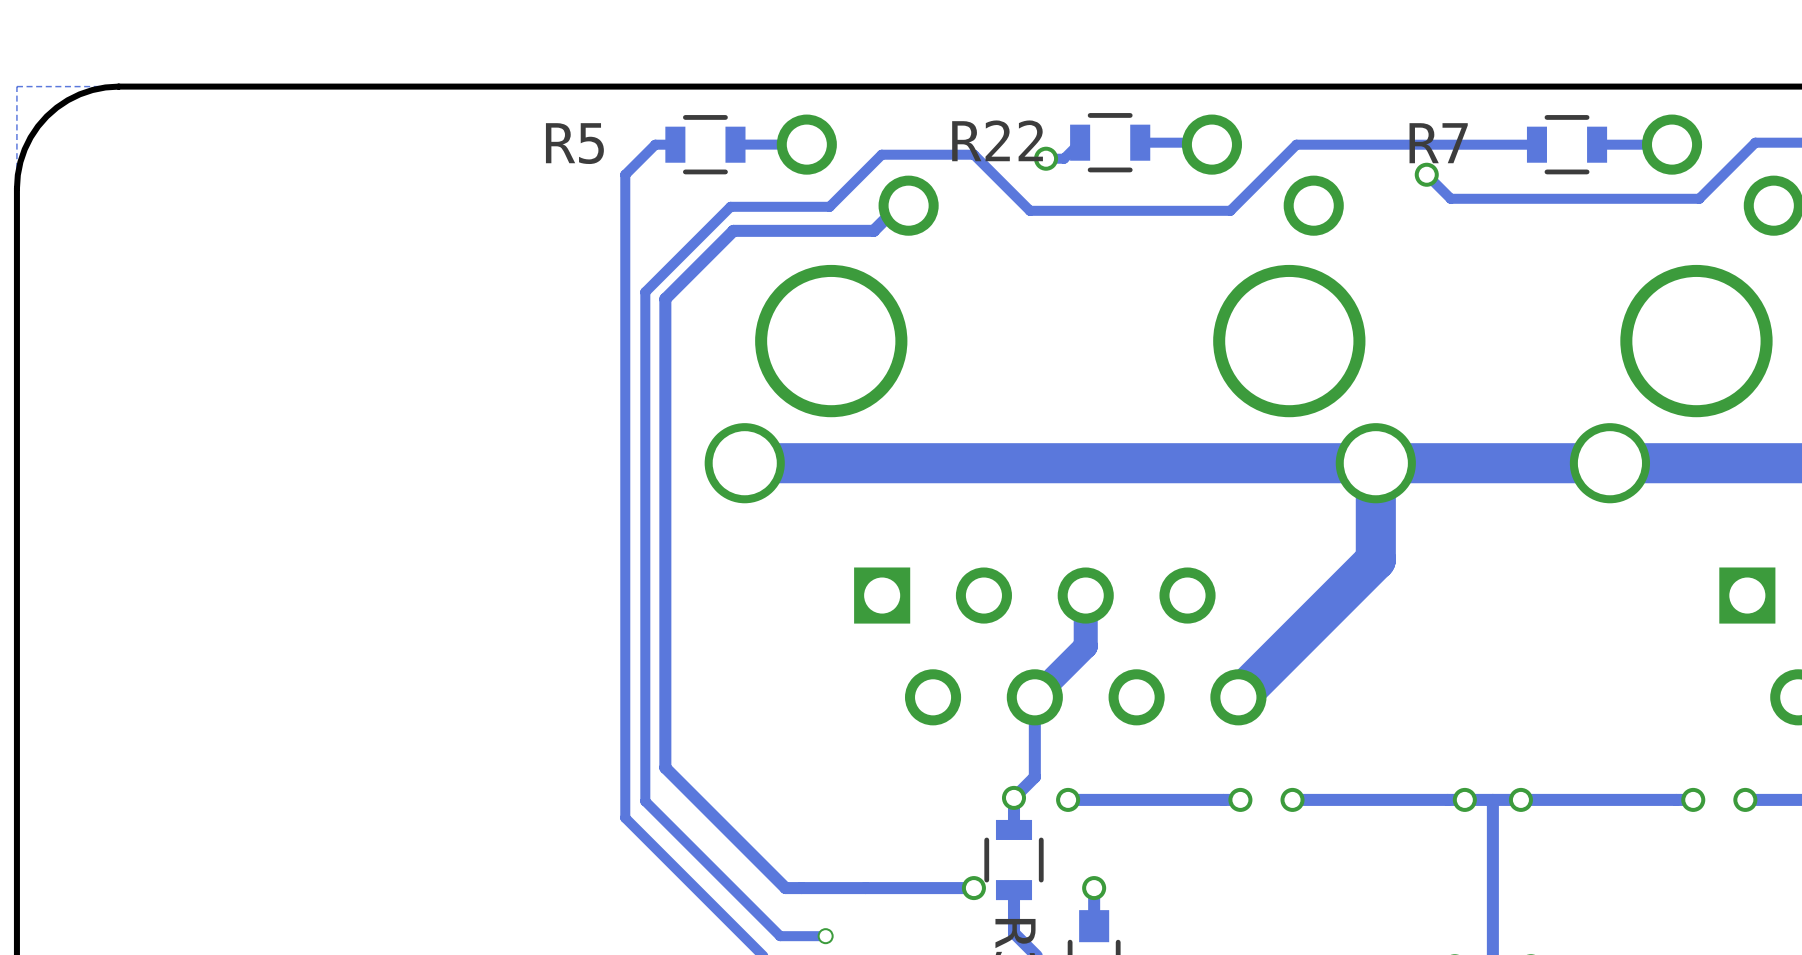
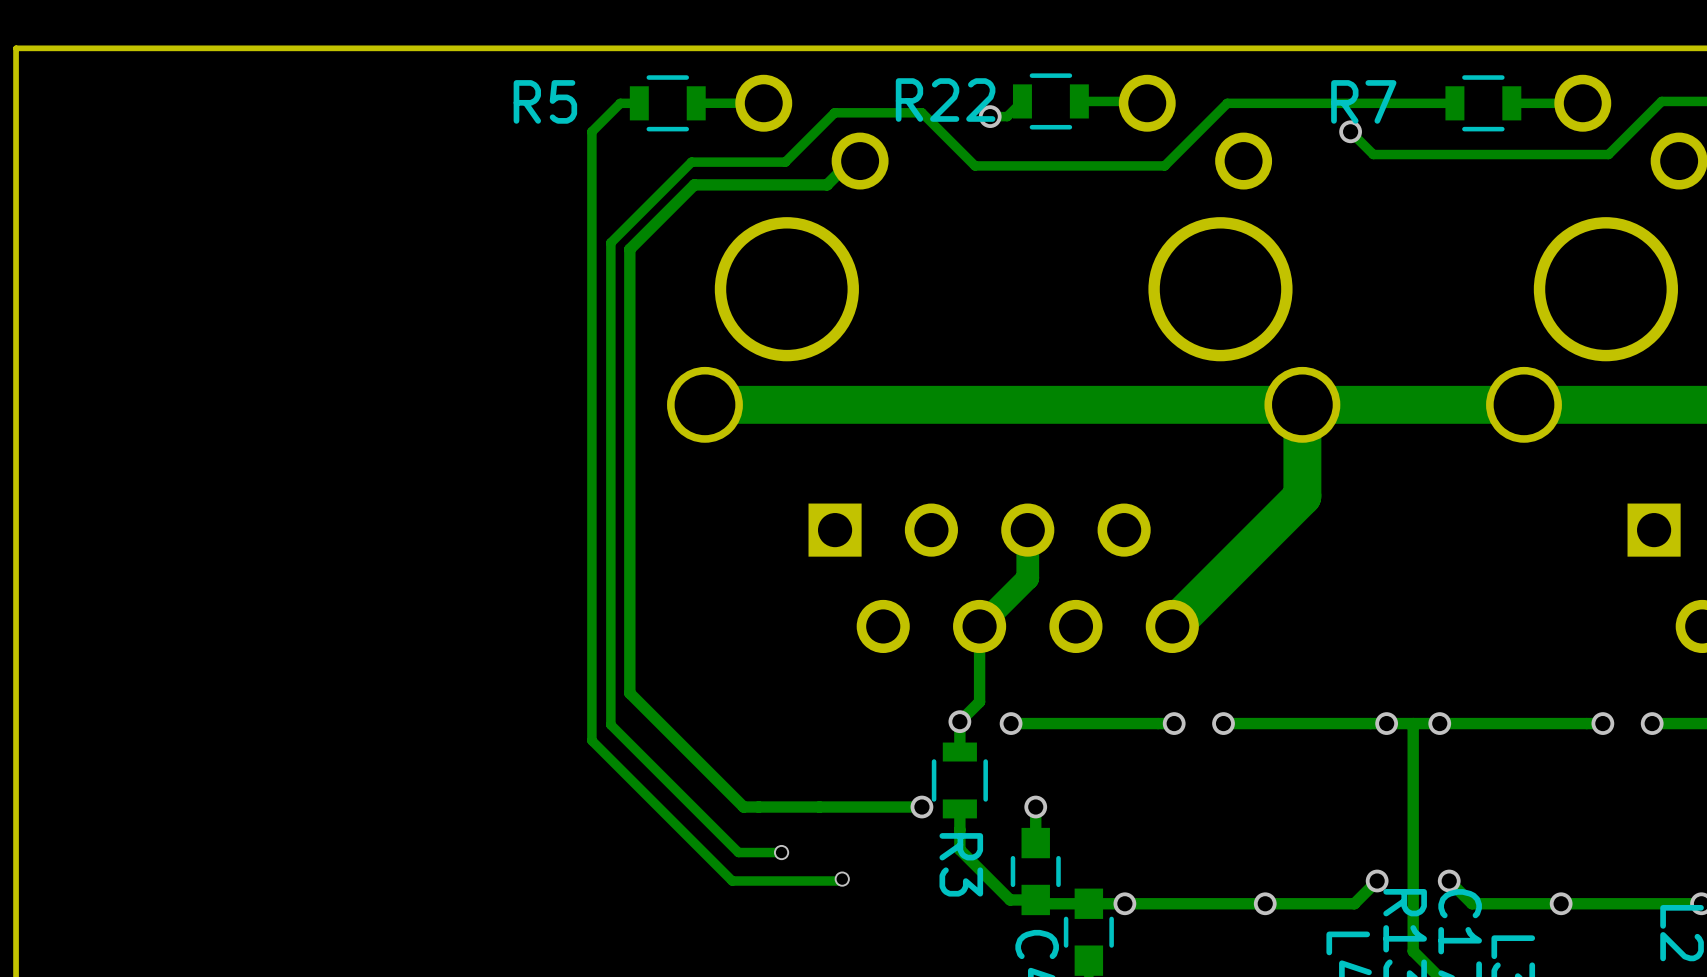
board edge: (118, 86) (105, 87) (79, 94) (67, 100) (46, 116) (37, 126) (24, 149) (20, 162) (16, 188) -> (112, 48) (16, 48) (16, 144)

